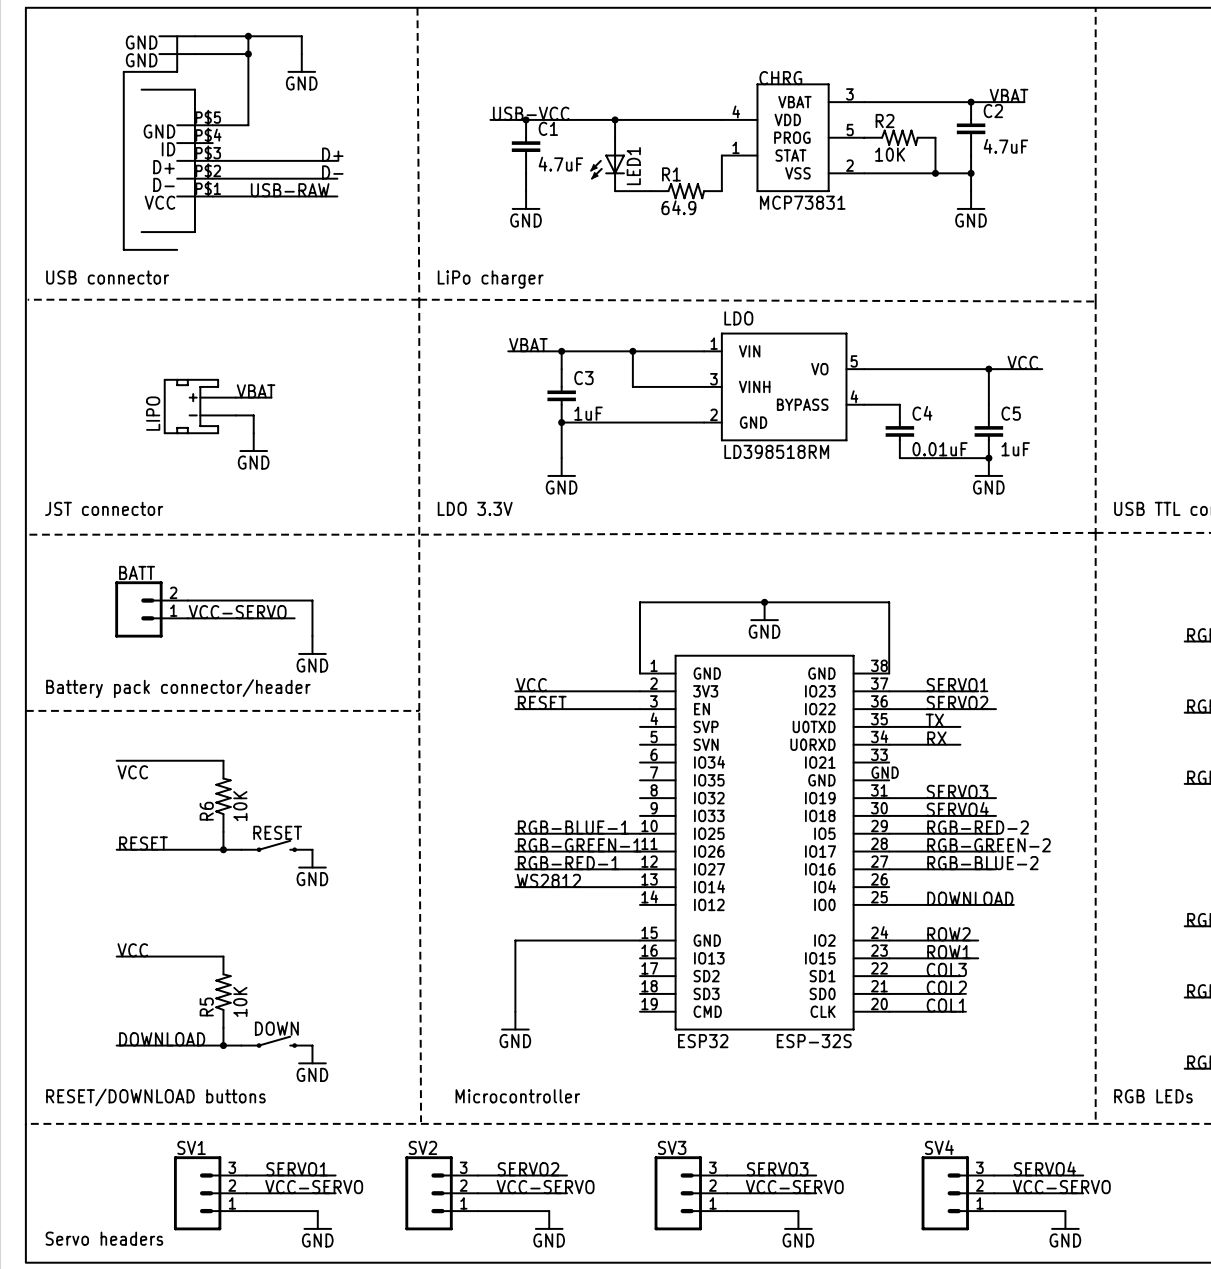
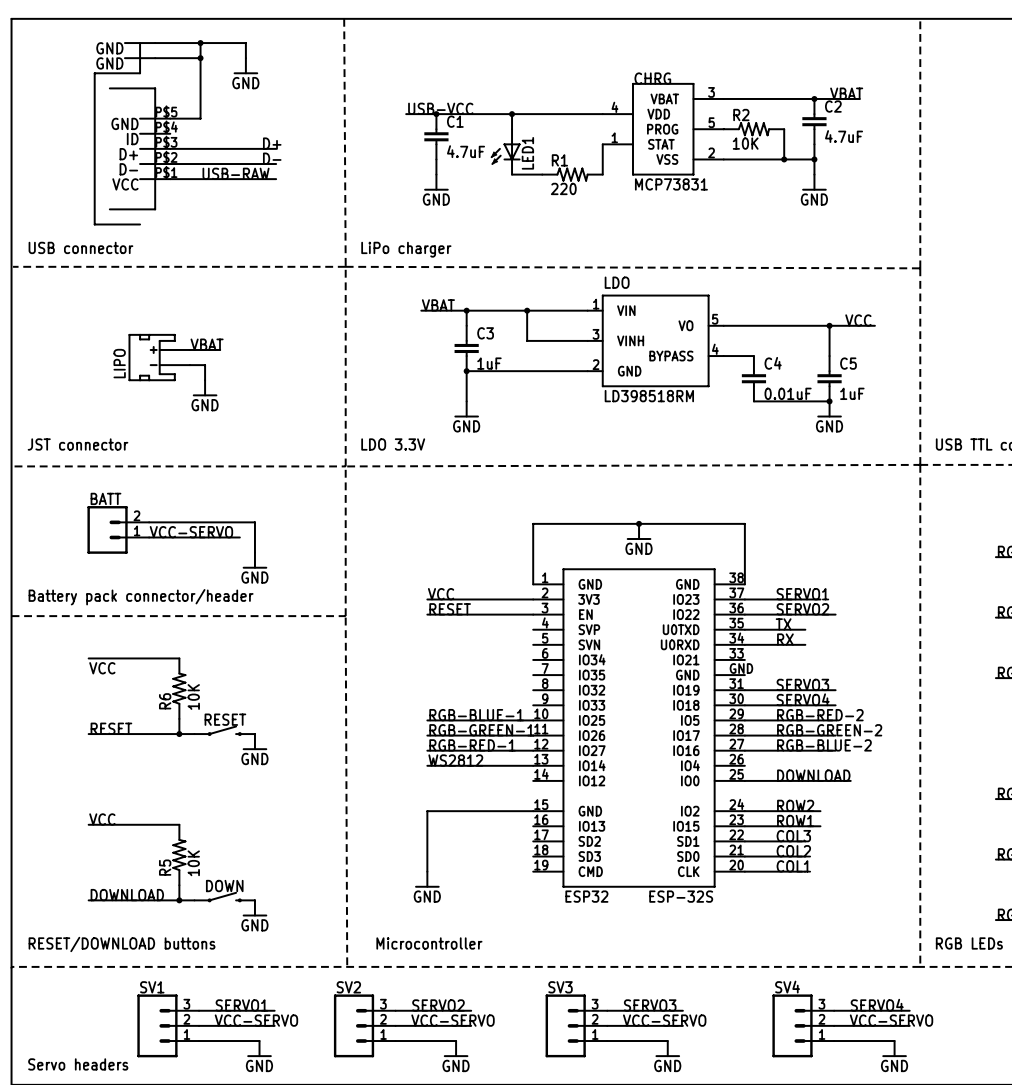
R1 value: 64.9 (678, 207) -> 220 (563, 188)

